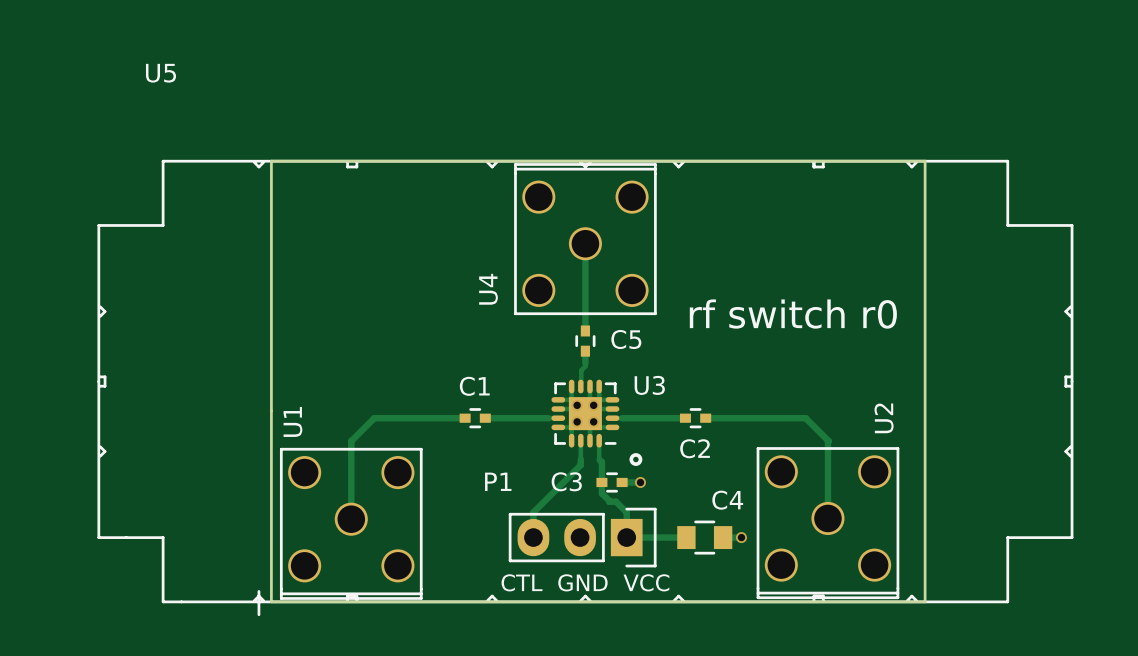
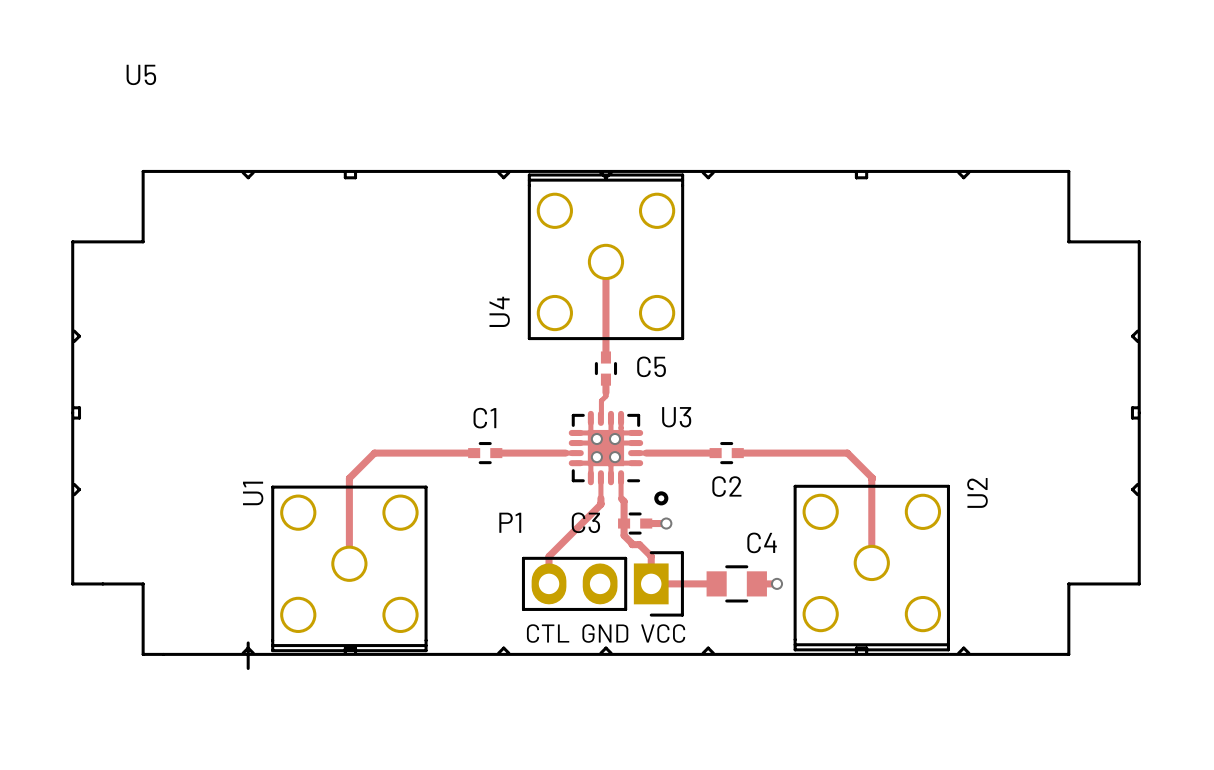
board edge: (271, 161) (925, 161) (925, 601) (271, 601) (271, 161) -> none
text: rf switch r0 (793, 314) -> none
U2 name position: U2 (884, 418) -> U2 (977, 492)
U1 name position: U1 (292, 421) -> U1 (253, 493)

